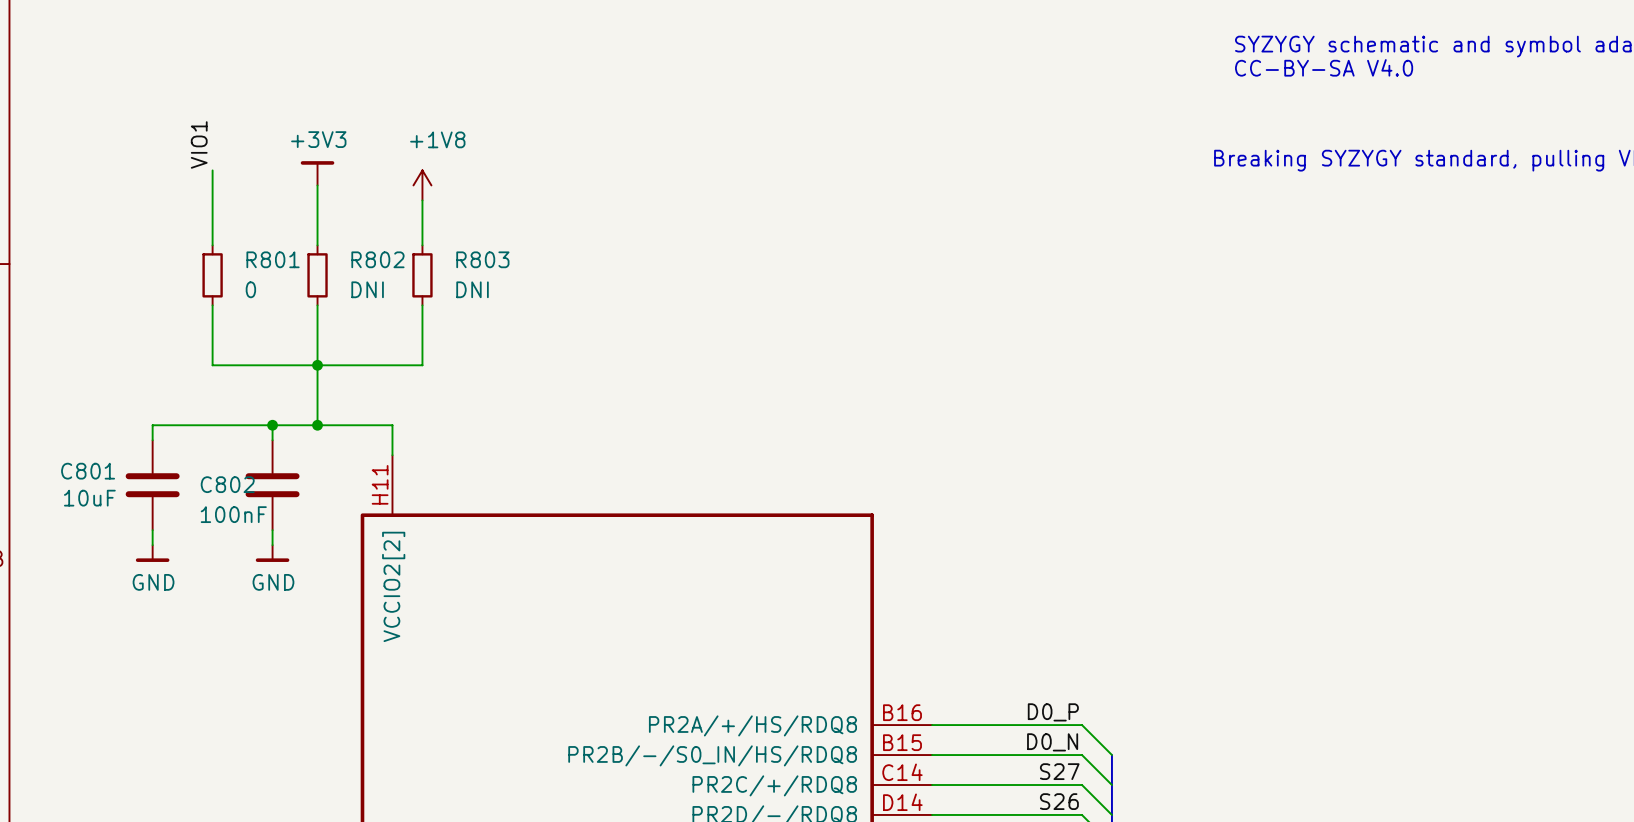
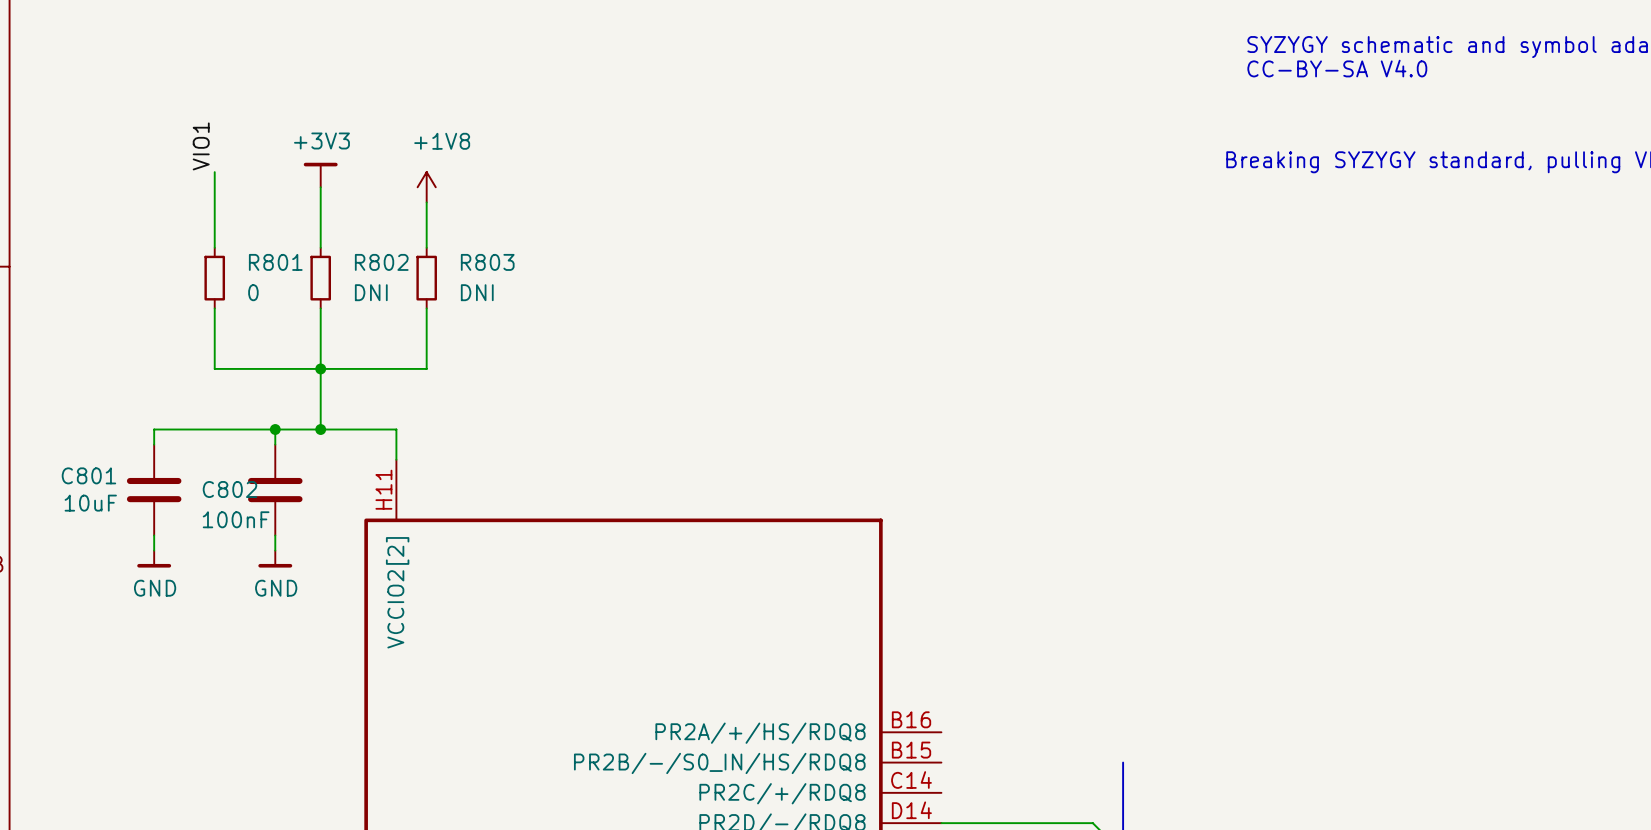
label: D0_P (1053, 712) -> none
wire: (932, 725) (1081, 725) (1111, 755) -> none
label: D0_N (1052, 742) -> none
wire: (932, 755) (1081, 755) (1111, 785) -> none
label: S27 (1059, 771) -> none
wire: (932, 785) (1081, 785) (1111, 814) -> none
label: S26 (1059, 801) -> none

